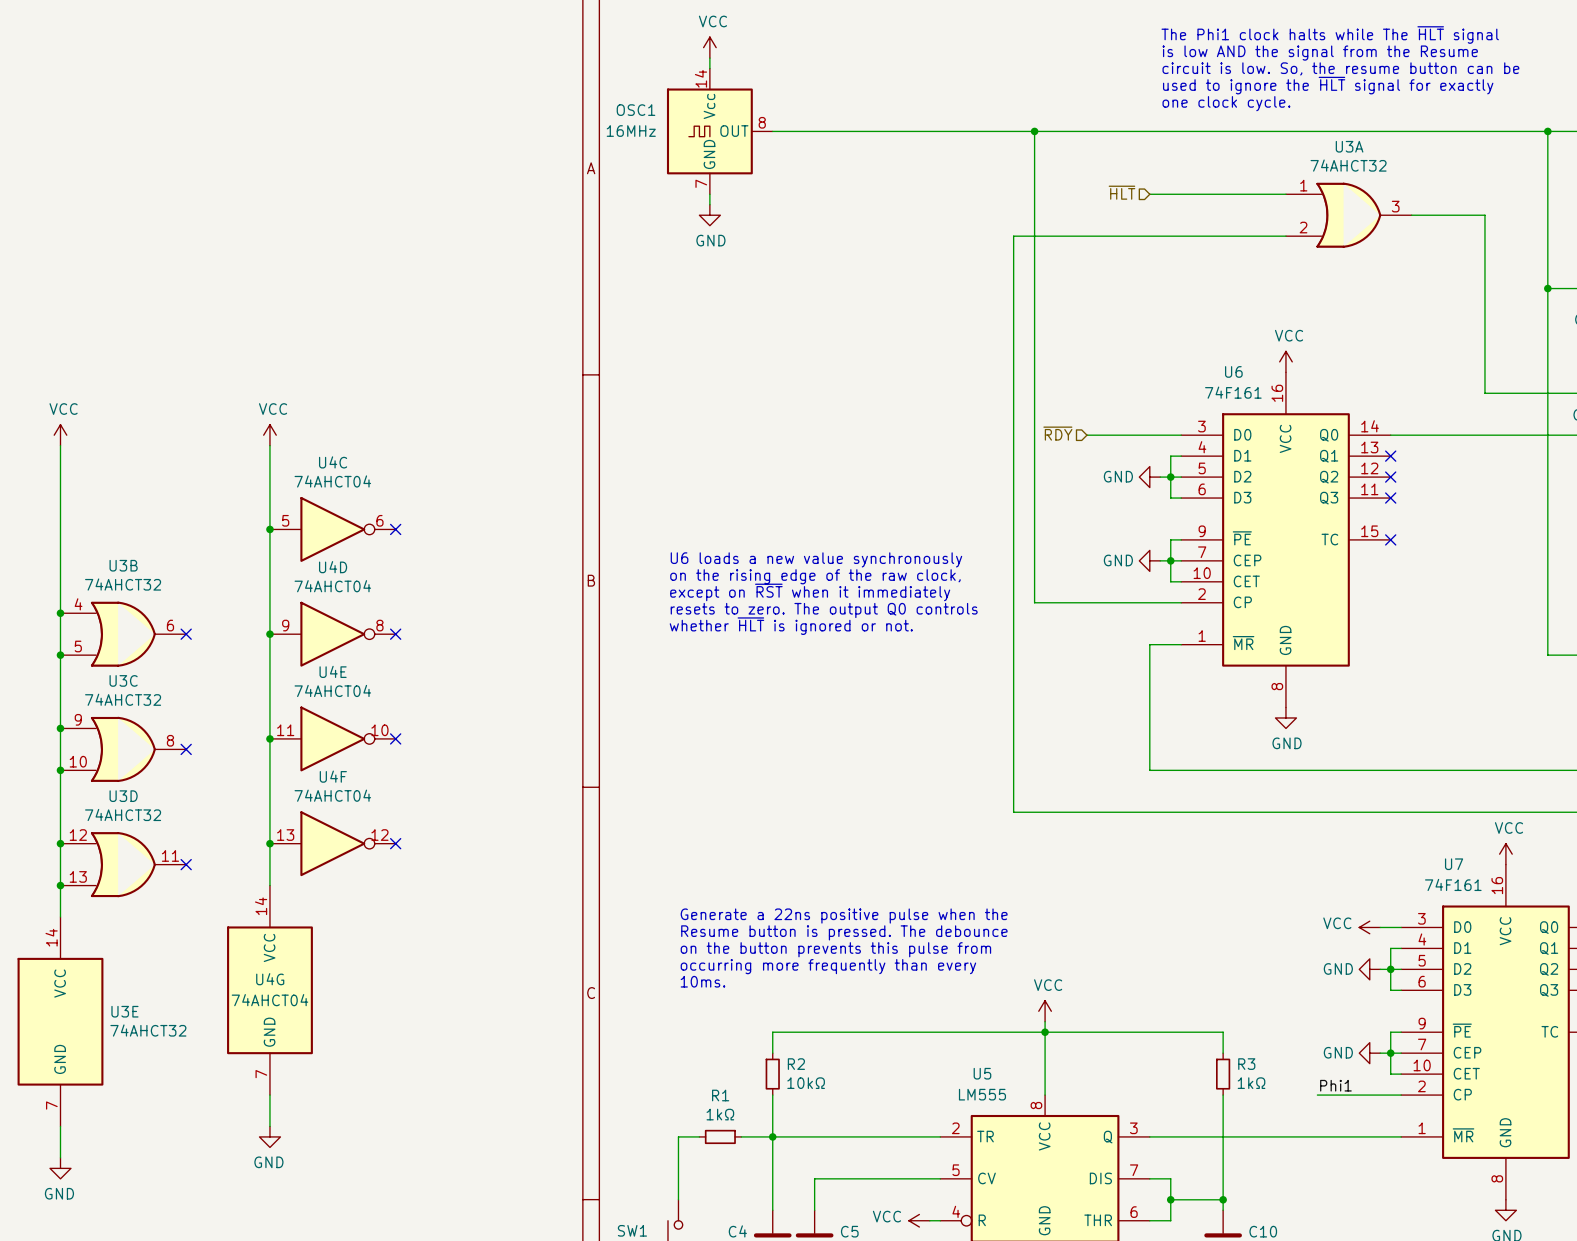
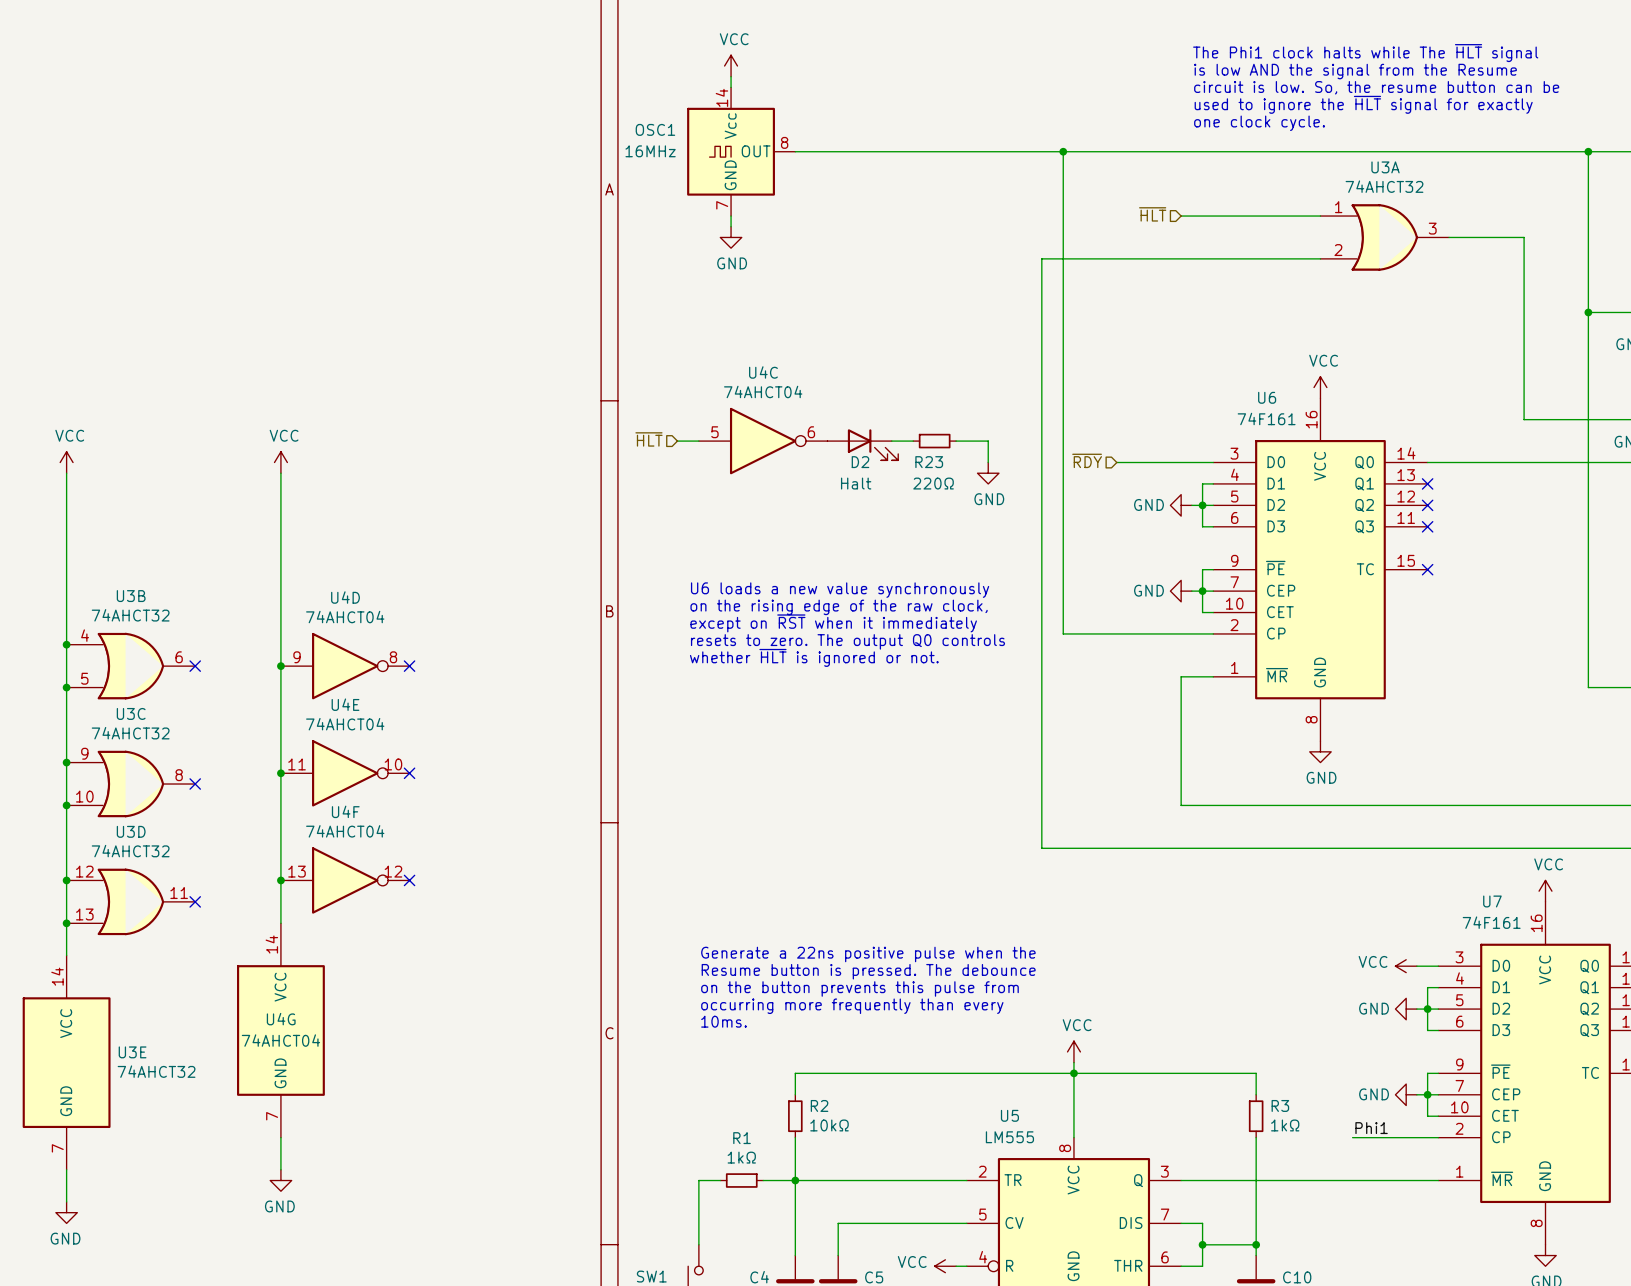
hierarchical label: none -> ~{HLT} (648, 439)
wire: none -> (677, 441) (698, 441)
wire: none -> (891, 441) (913, 441)
R23: none -> 220Ω (934, 441)
wire: none -> (956, 441) (988, 441) (988, 462)
D2: none -> Halt (862, 444)
power symbol: none -> GND (988, 473)
junction: (269, 529) -> none
U4C position: (332, 529) -> (763, 441)
no-connect mark: (395, 529) -> none

